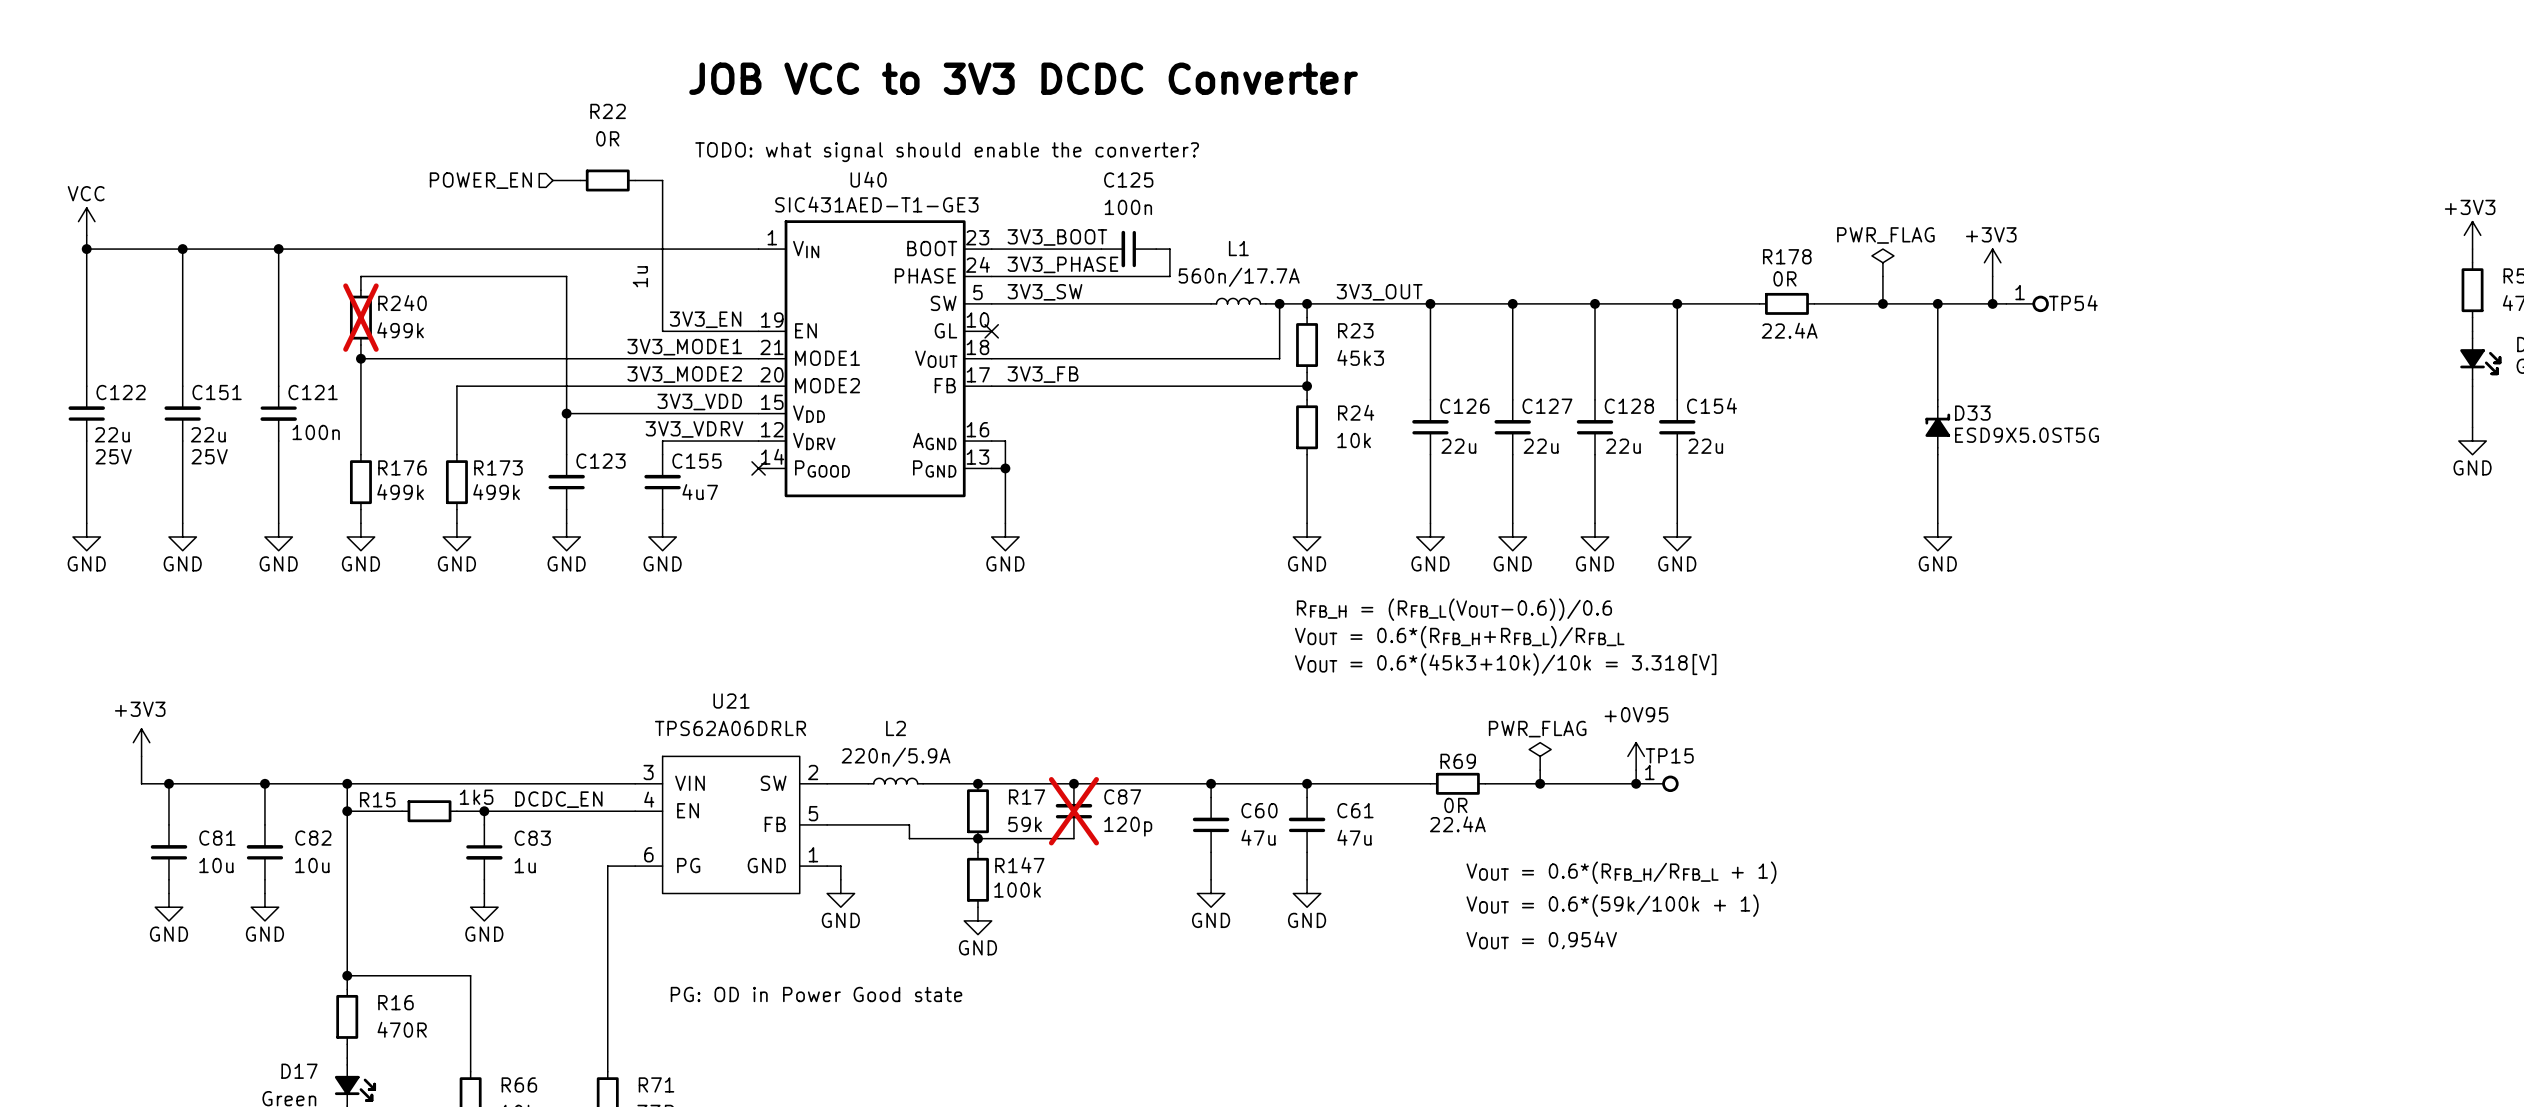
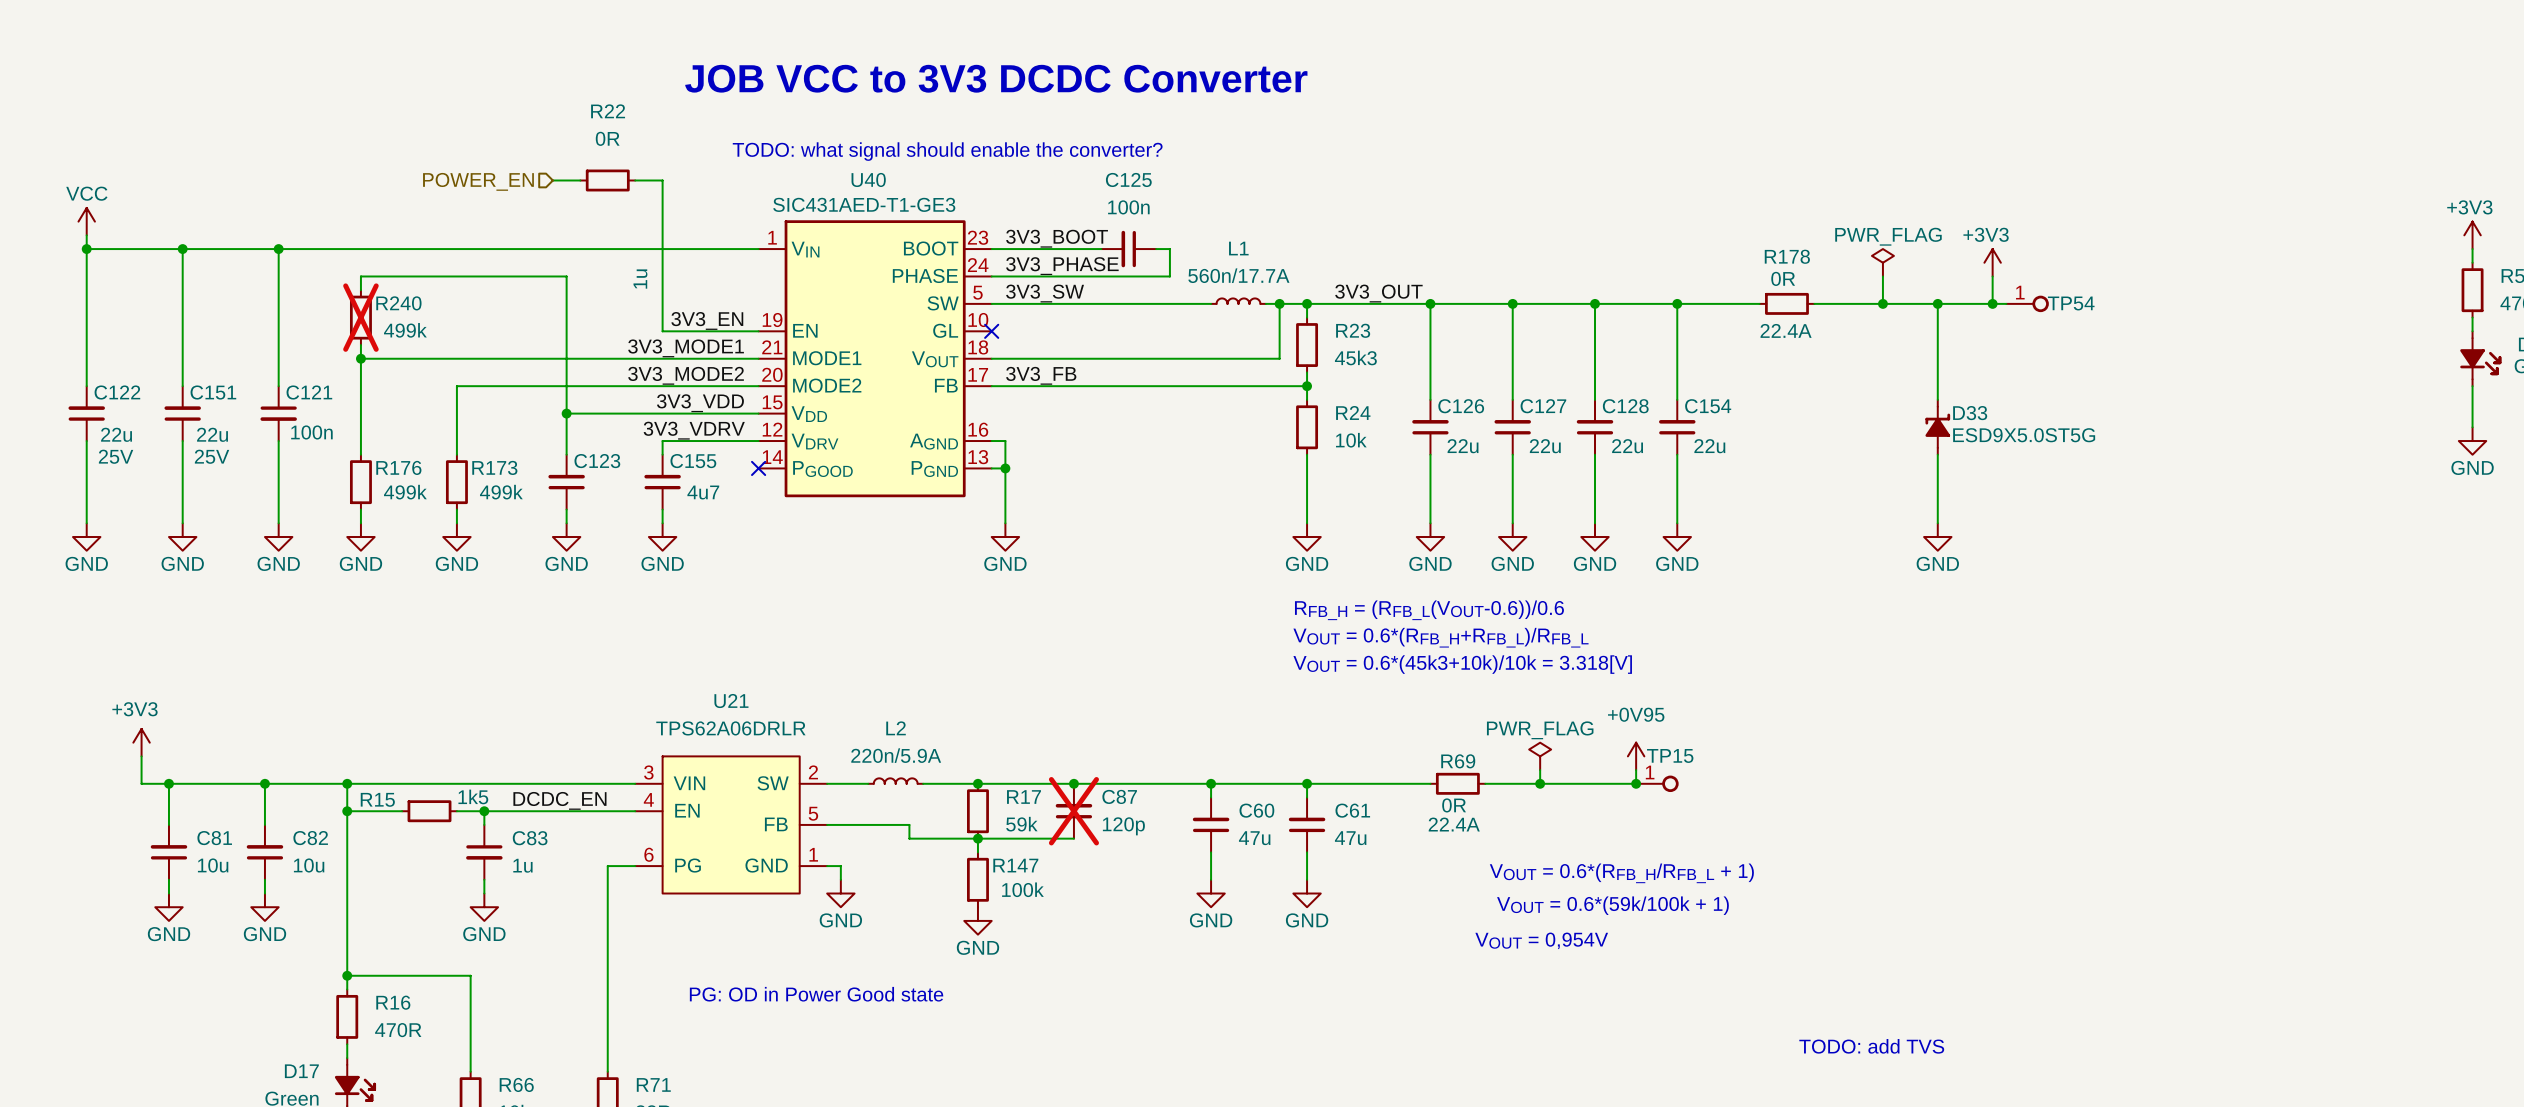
text: none -> TODO: add TVS (1871, 1046)

